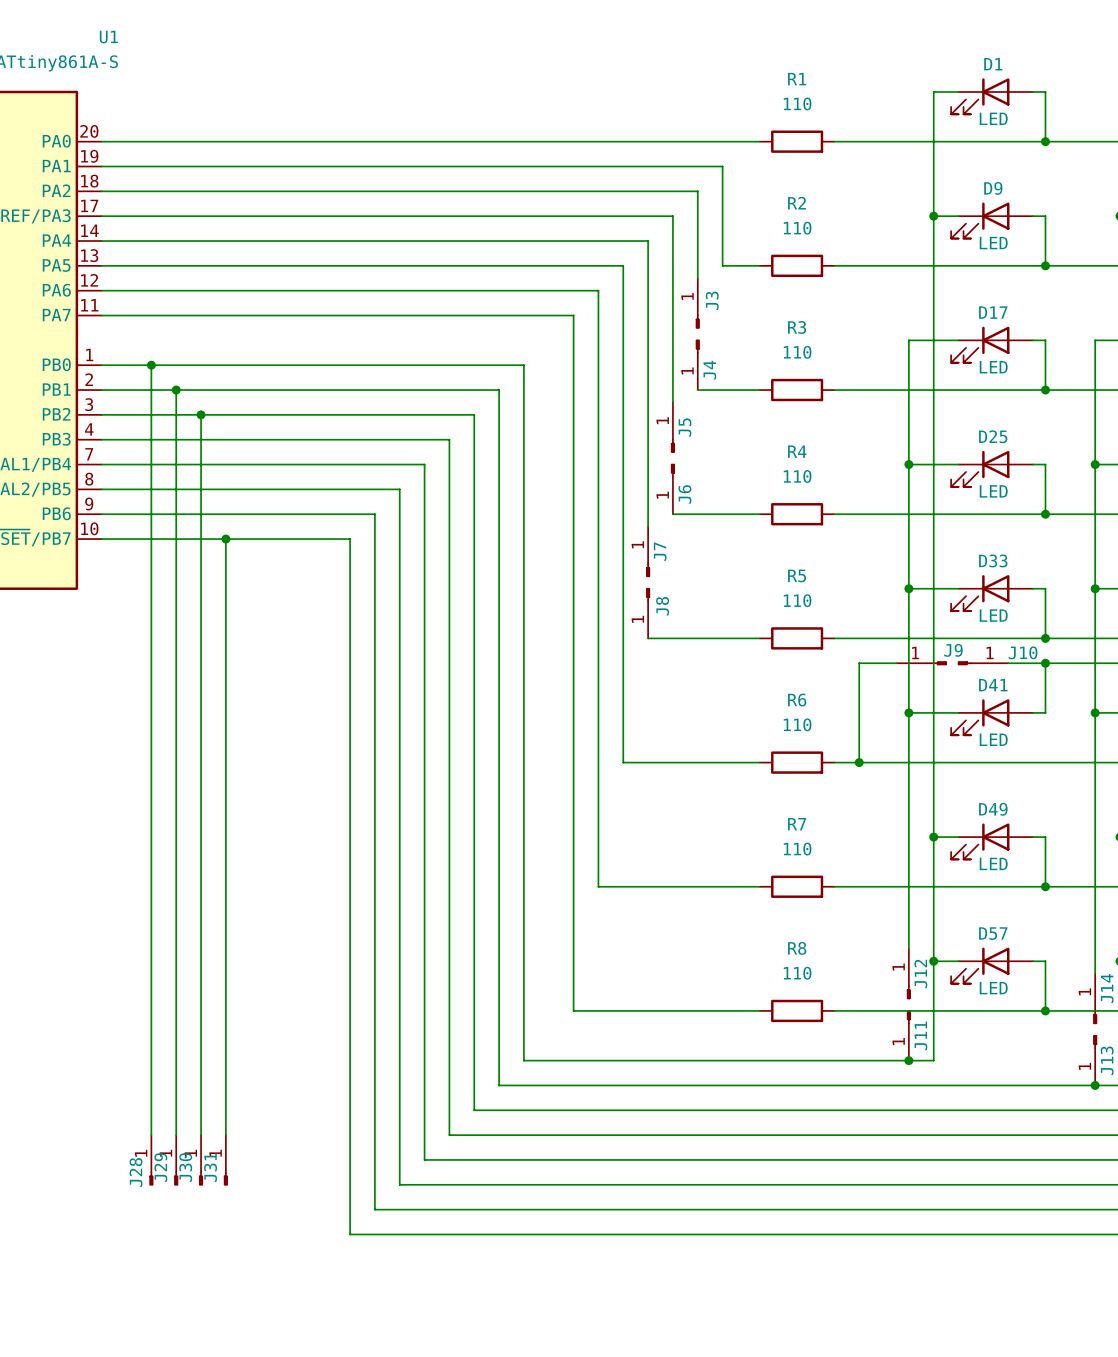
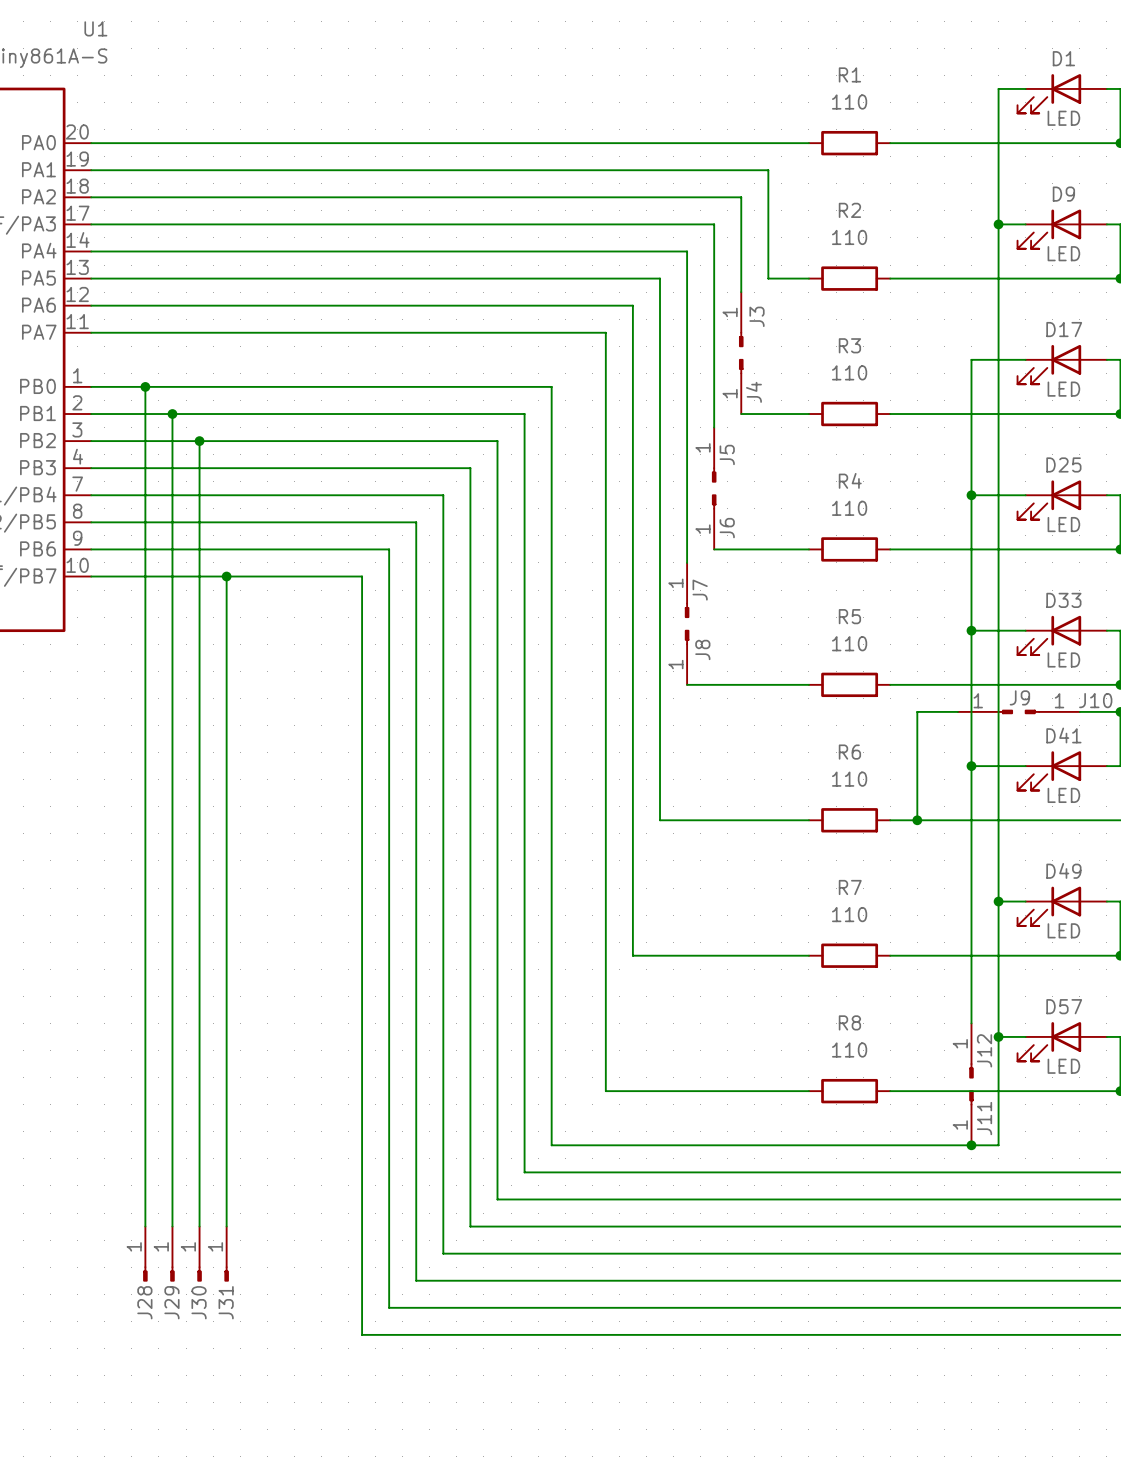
J29 name position: J29 (160, 1167) -> J29 (171, 1302)
J30 name position: J30 (185, 1167) -> J30 (199, 1302)
J31 name position: J31 (210, 1167) -> J31 (226, 1302)
J28 name position: J28 (136, 1172) -> J28 (144, 1302)

